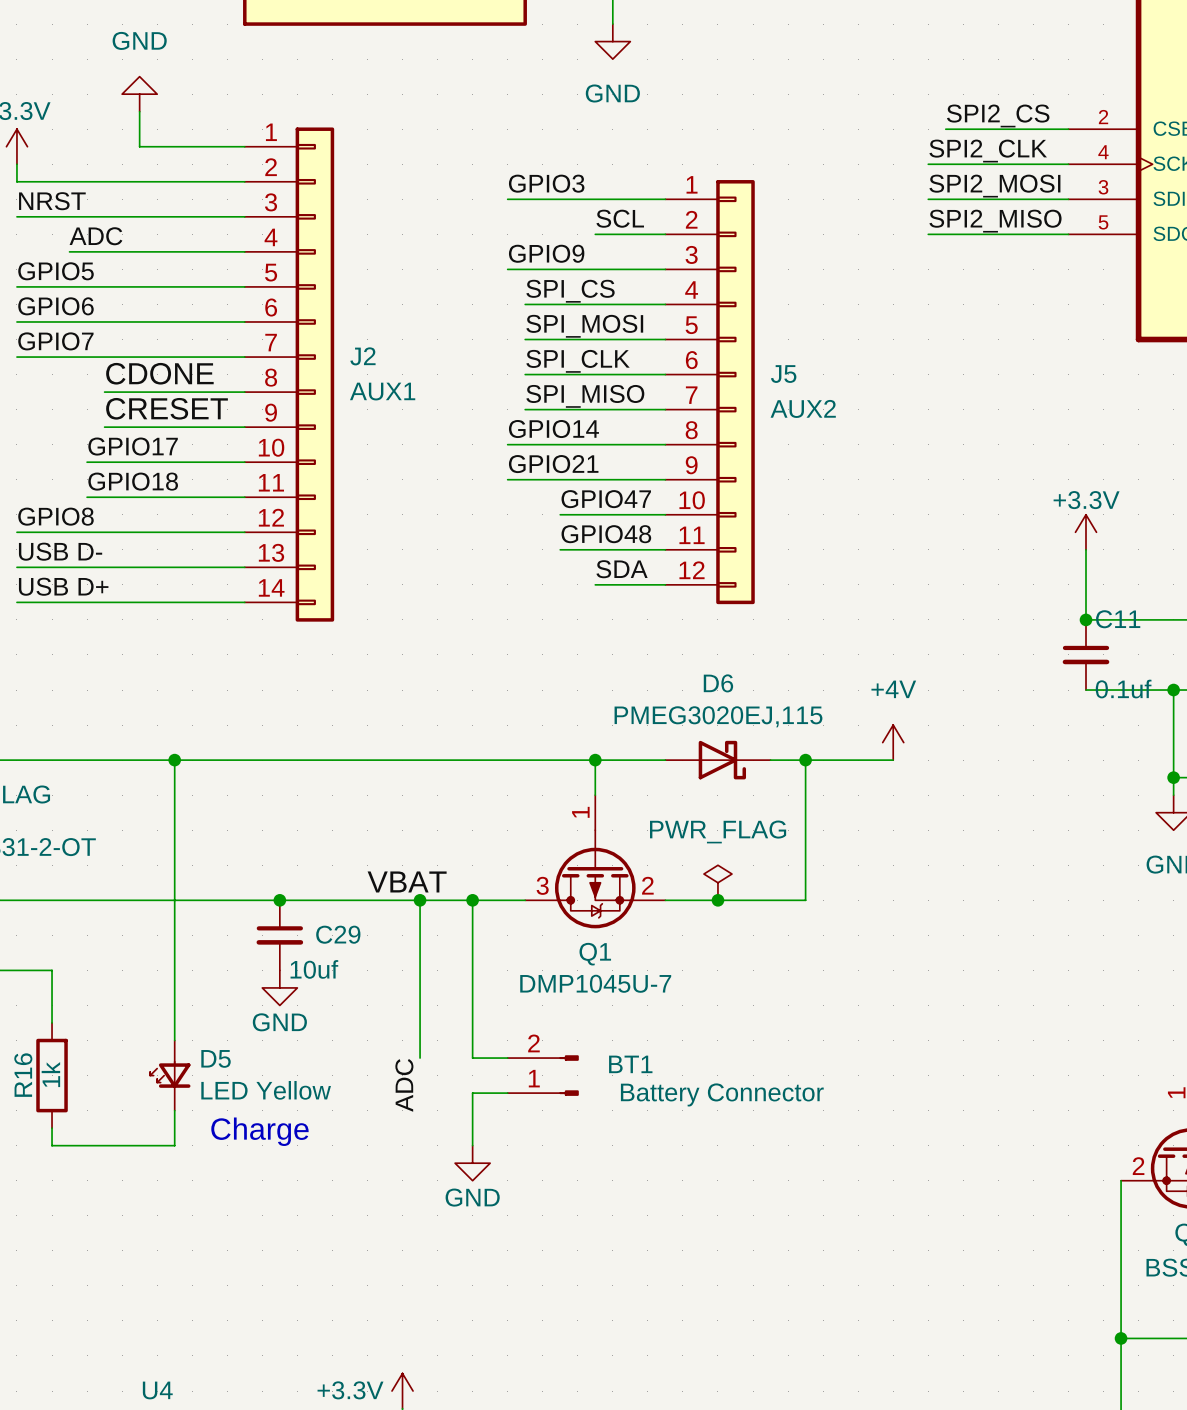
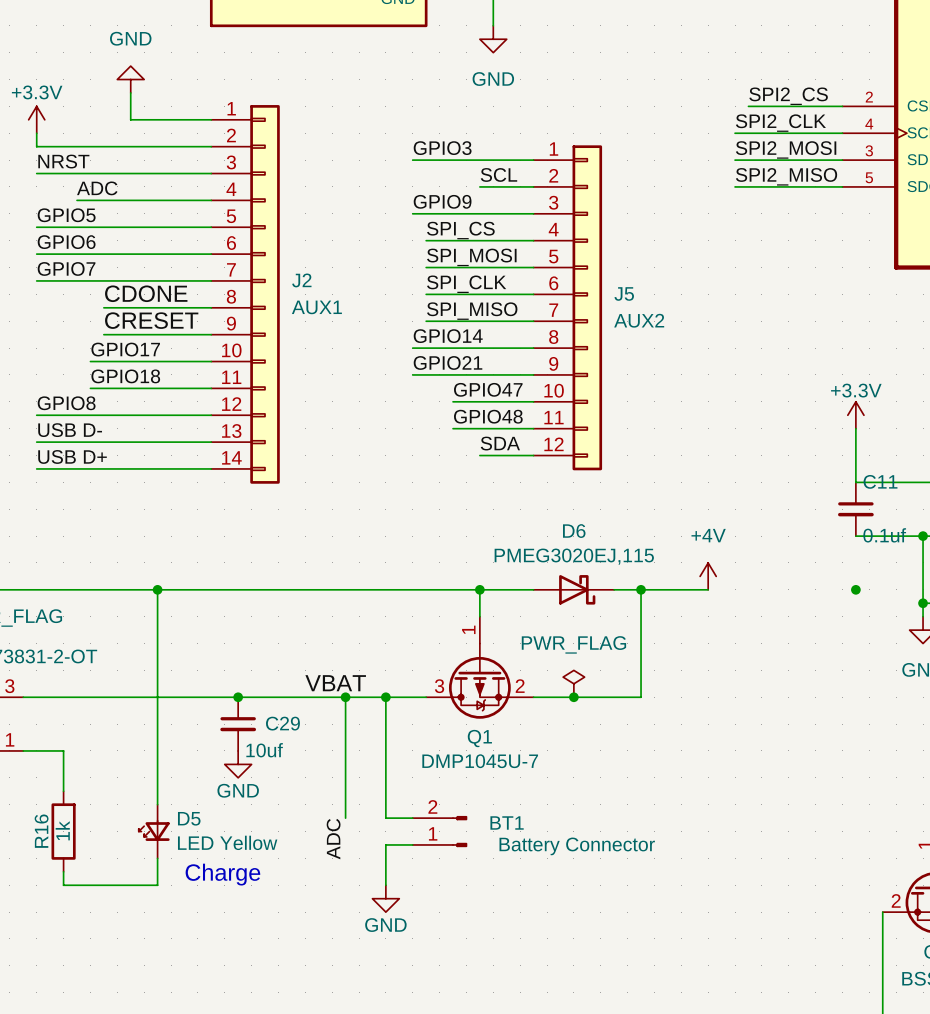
junction: (1086, 619) -> none
junction: none -> (855, 589)

